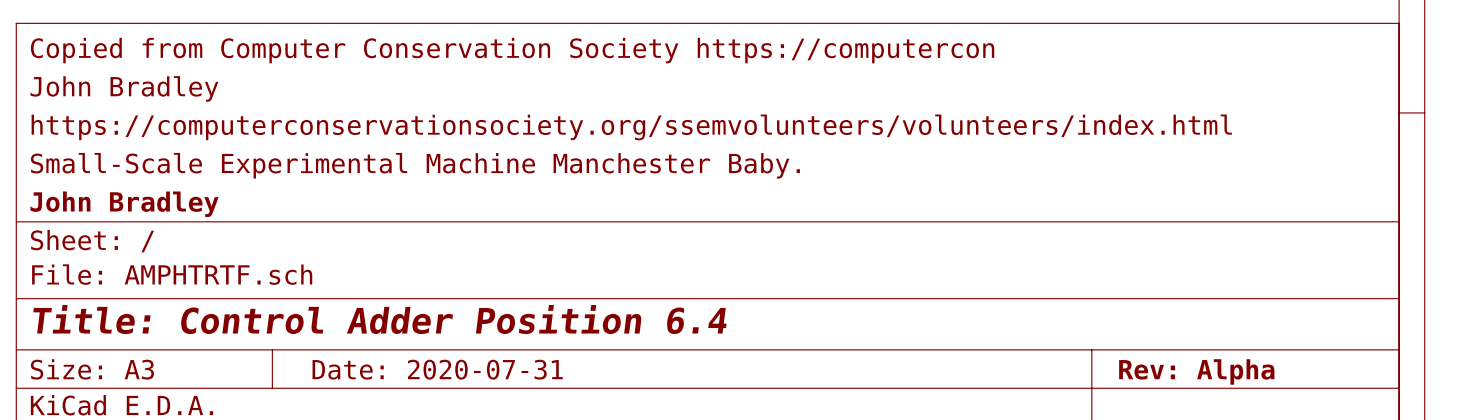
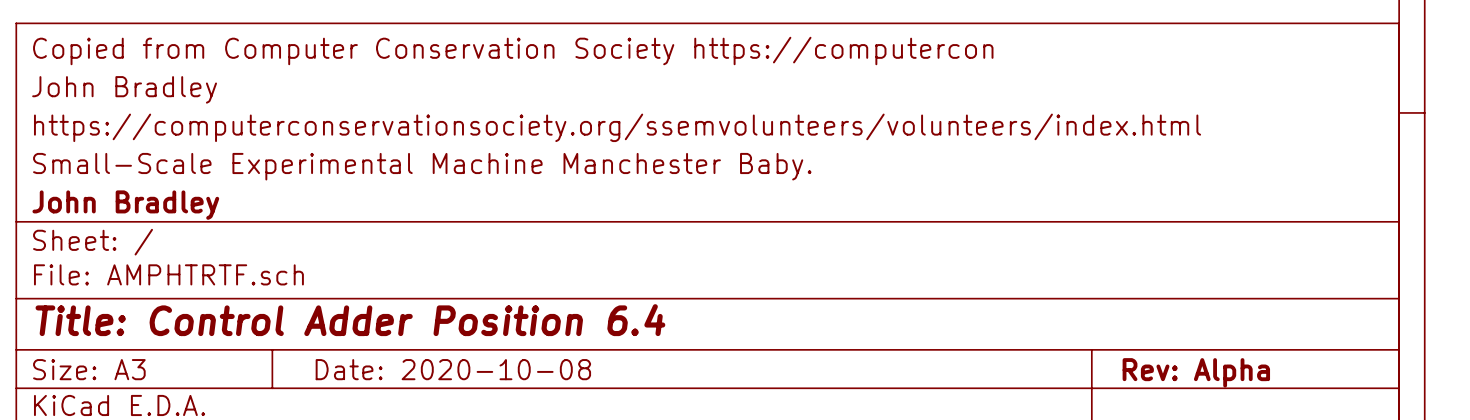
title block: Date: 2020-07-31 (437, 369) -> Date: 2020-10-08 (453, 369)

